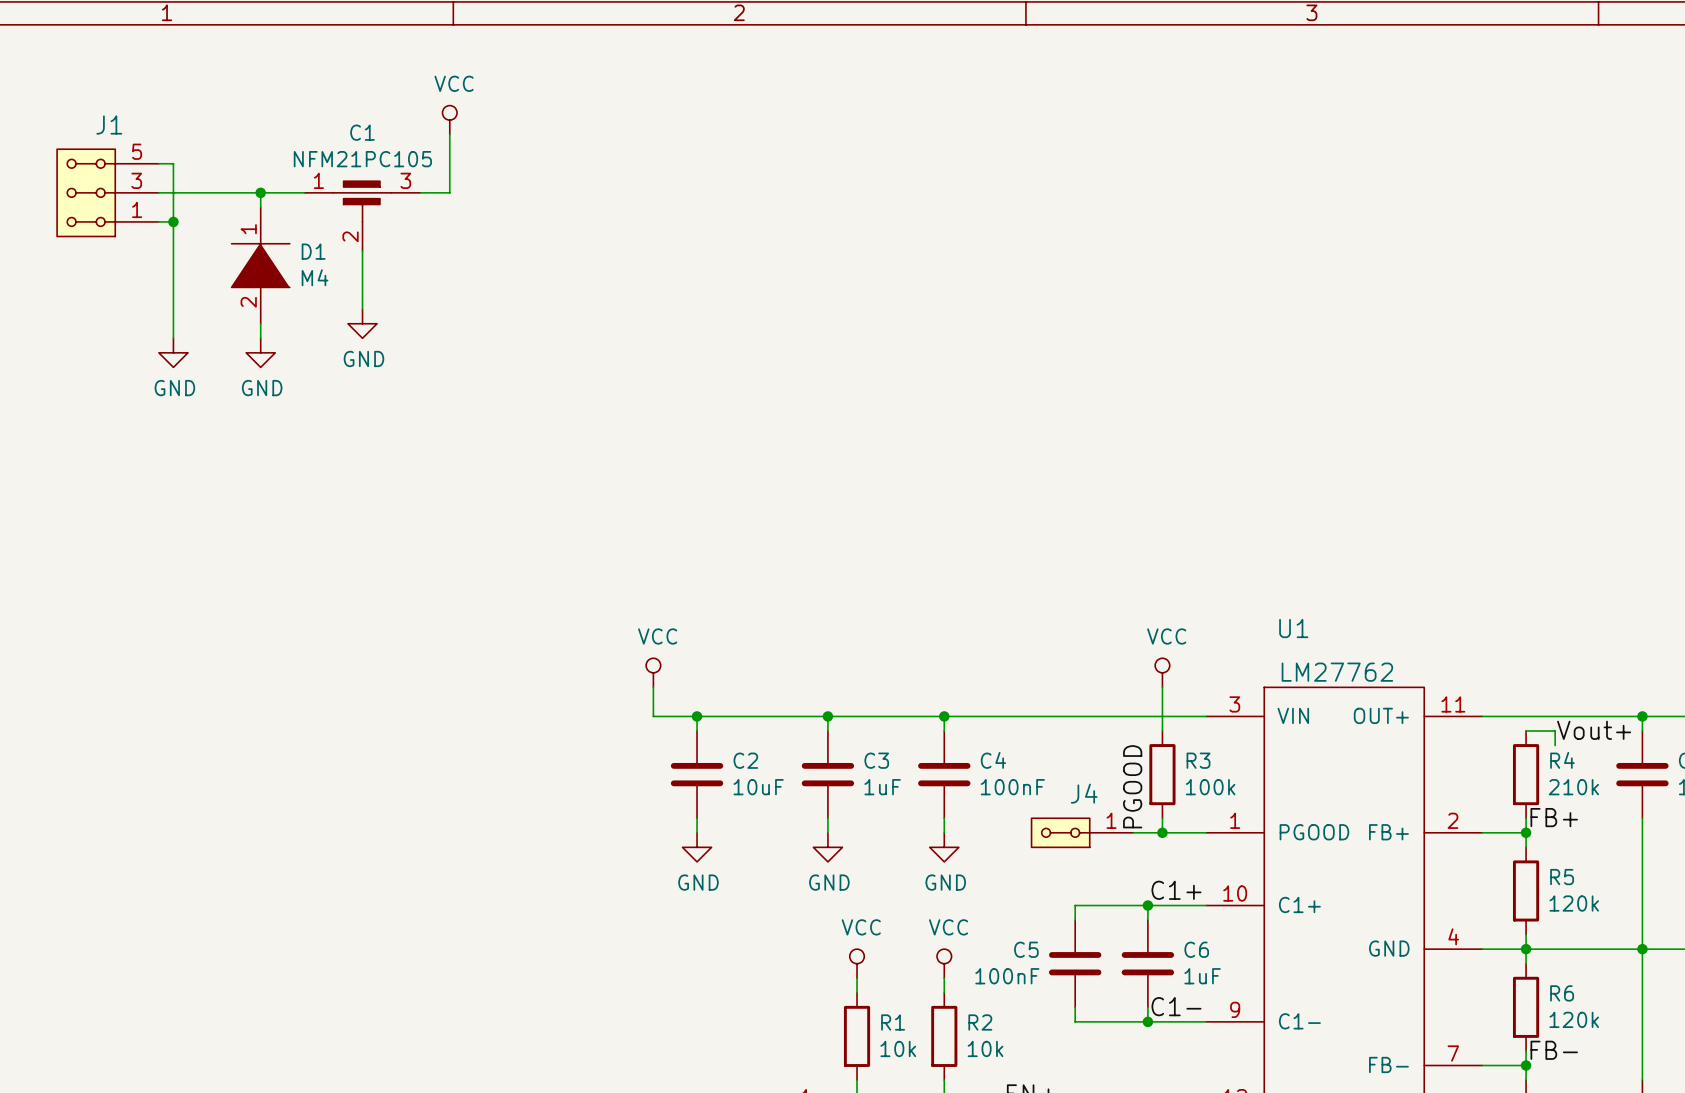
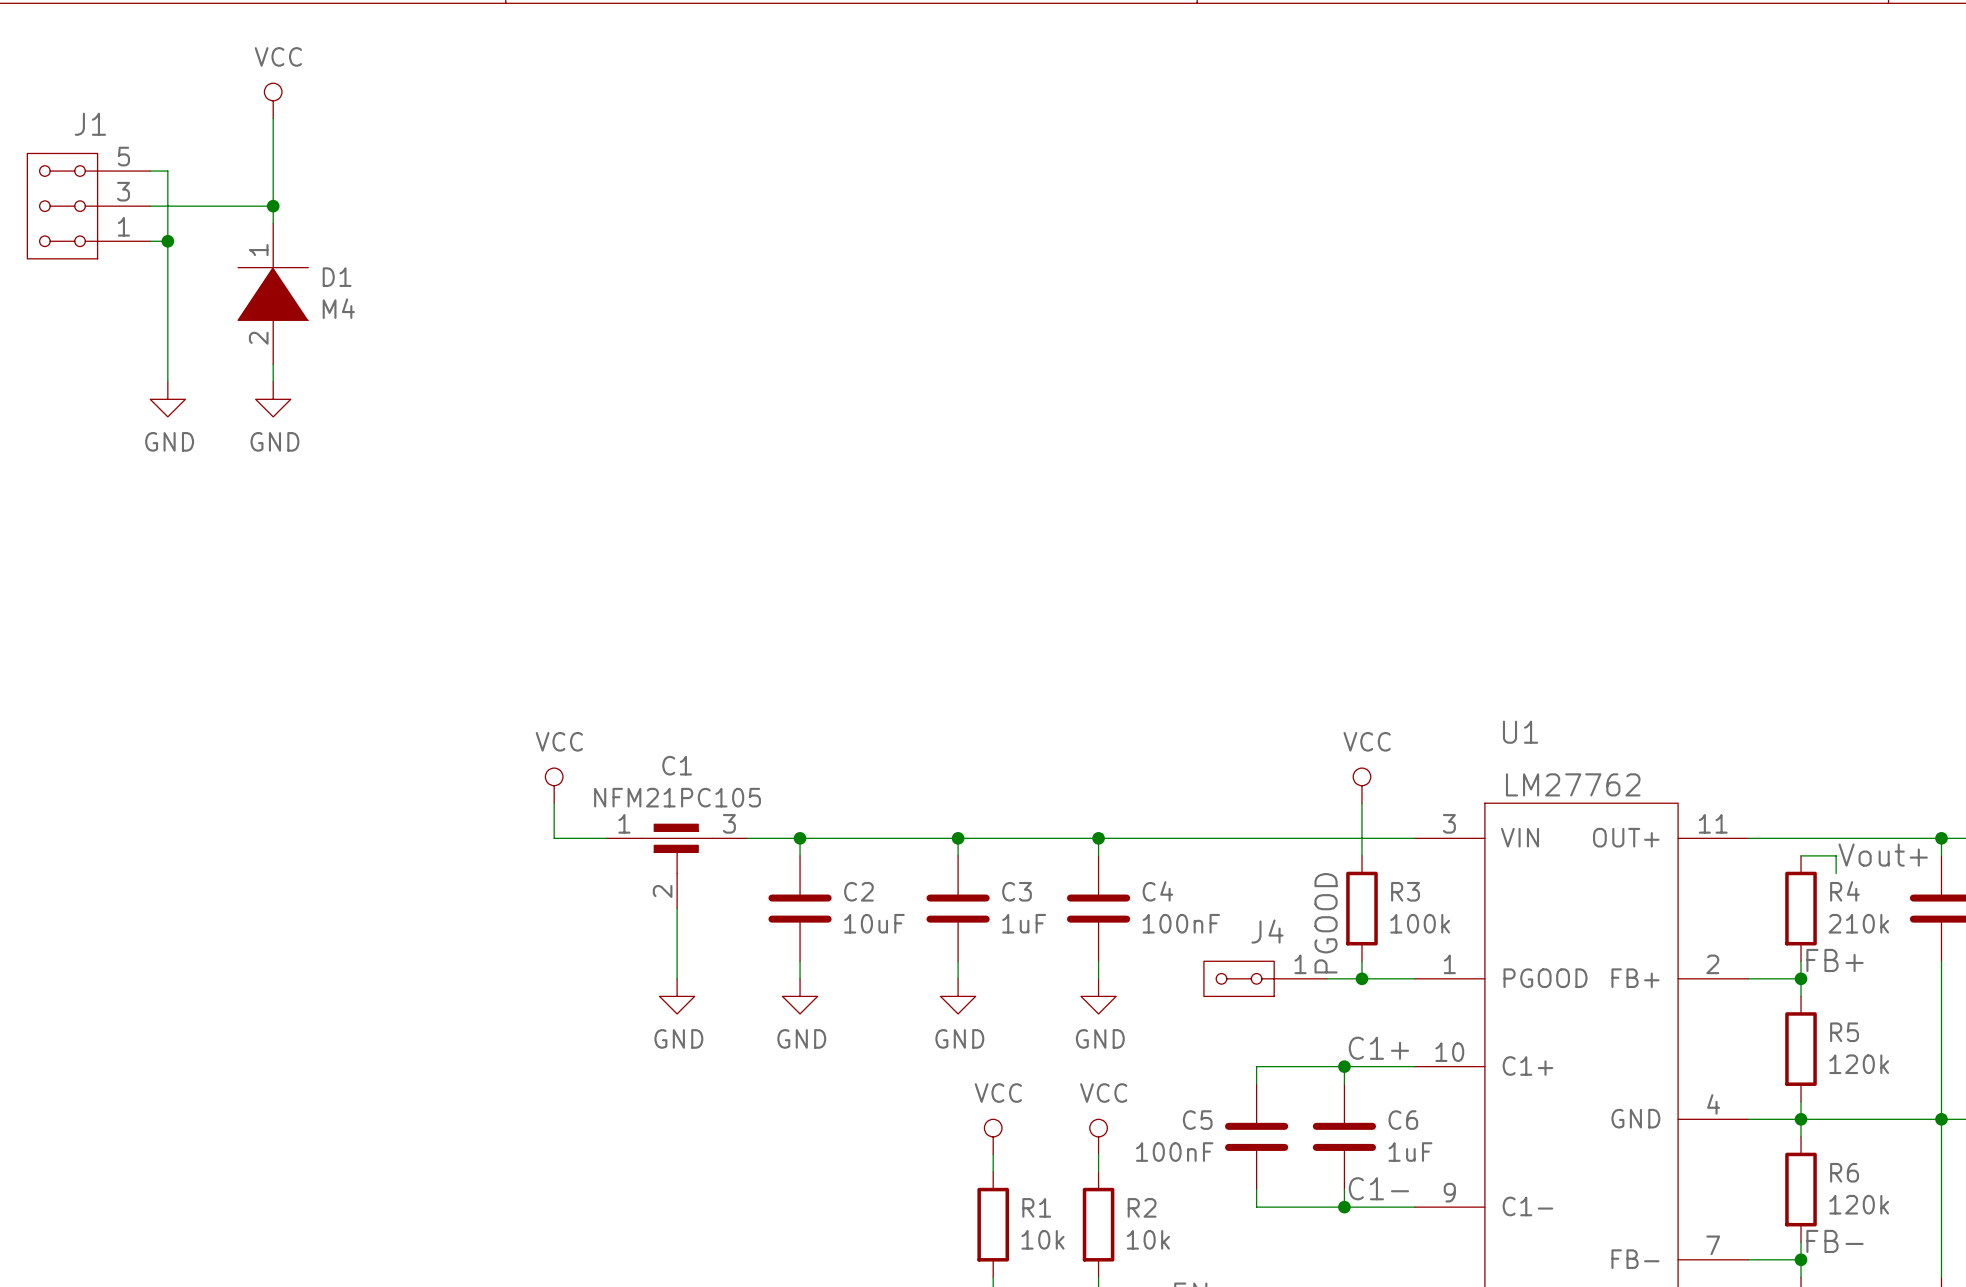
power symbol position: VCC (449, 120) -> VCC (273, 100)
wire: (449, 134) (449, 192) (420, 192) -> none
wire: (260, 192) (304, 192) -> (273, 206) (273, 118)
C1 position: (362, 216) -> (677, 866)
wire: (362, 251) (362, 309) -> none
power symbol: GND (362, 323) -> none
power symbol position: VCC (653, 672) -> VCC (554, 785)
wire: none -> (554, 803) (554, 838) (606, 838)
wire: (653, 687) (653, 716) -> none
wire: none -> (677, 908) (677, 978)
power symbol: none -> GND (677, 996)

